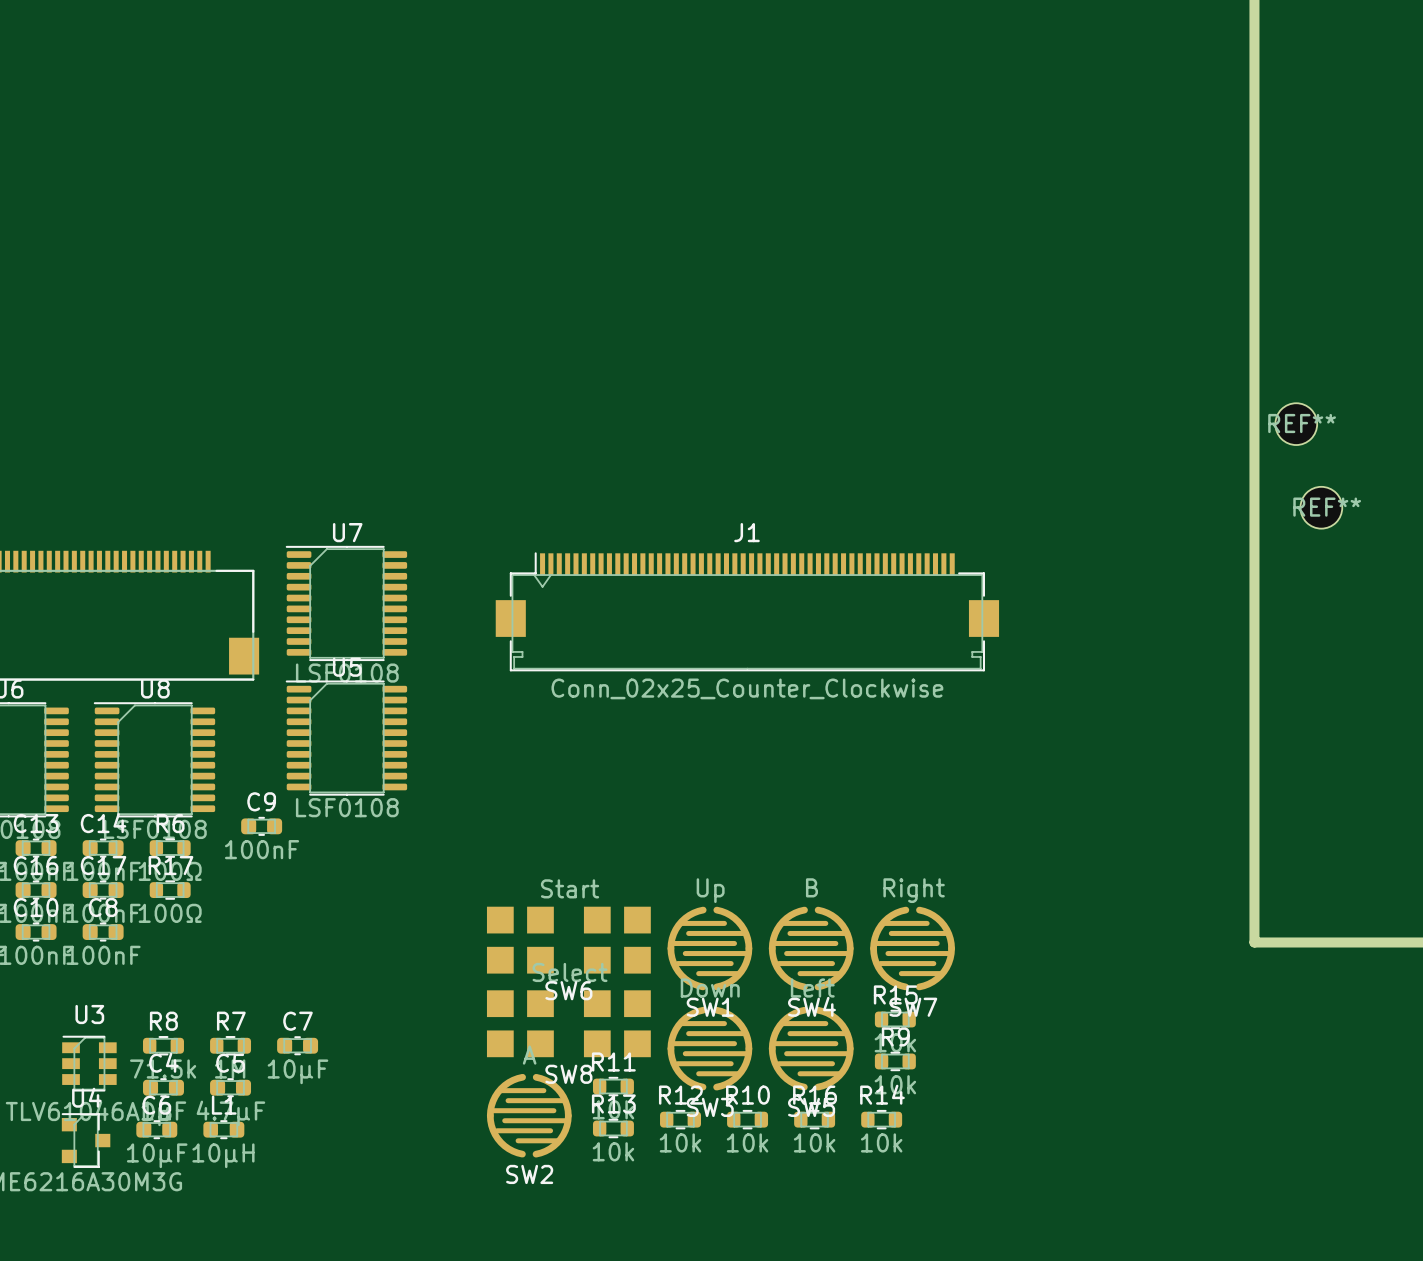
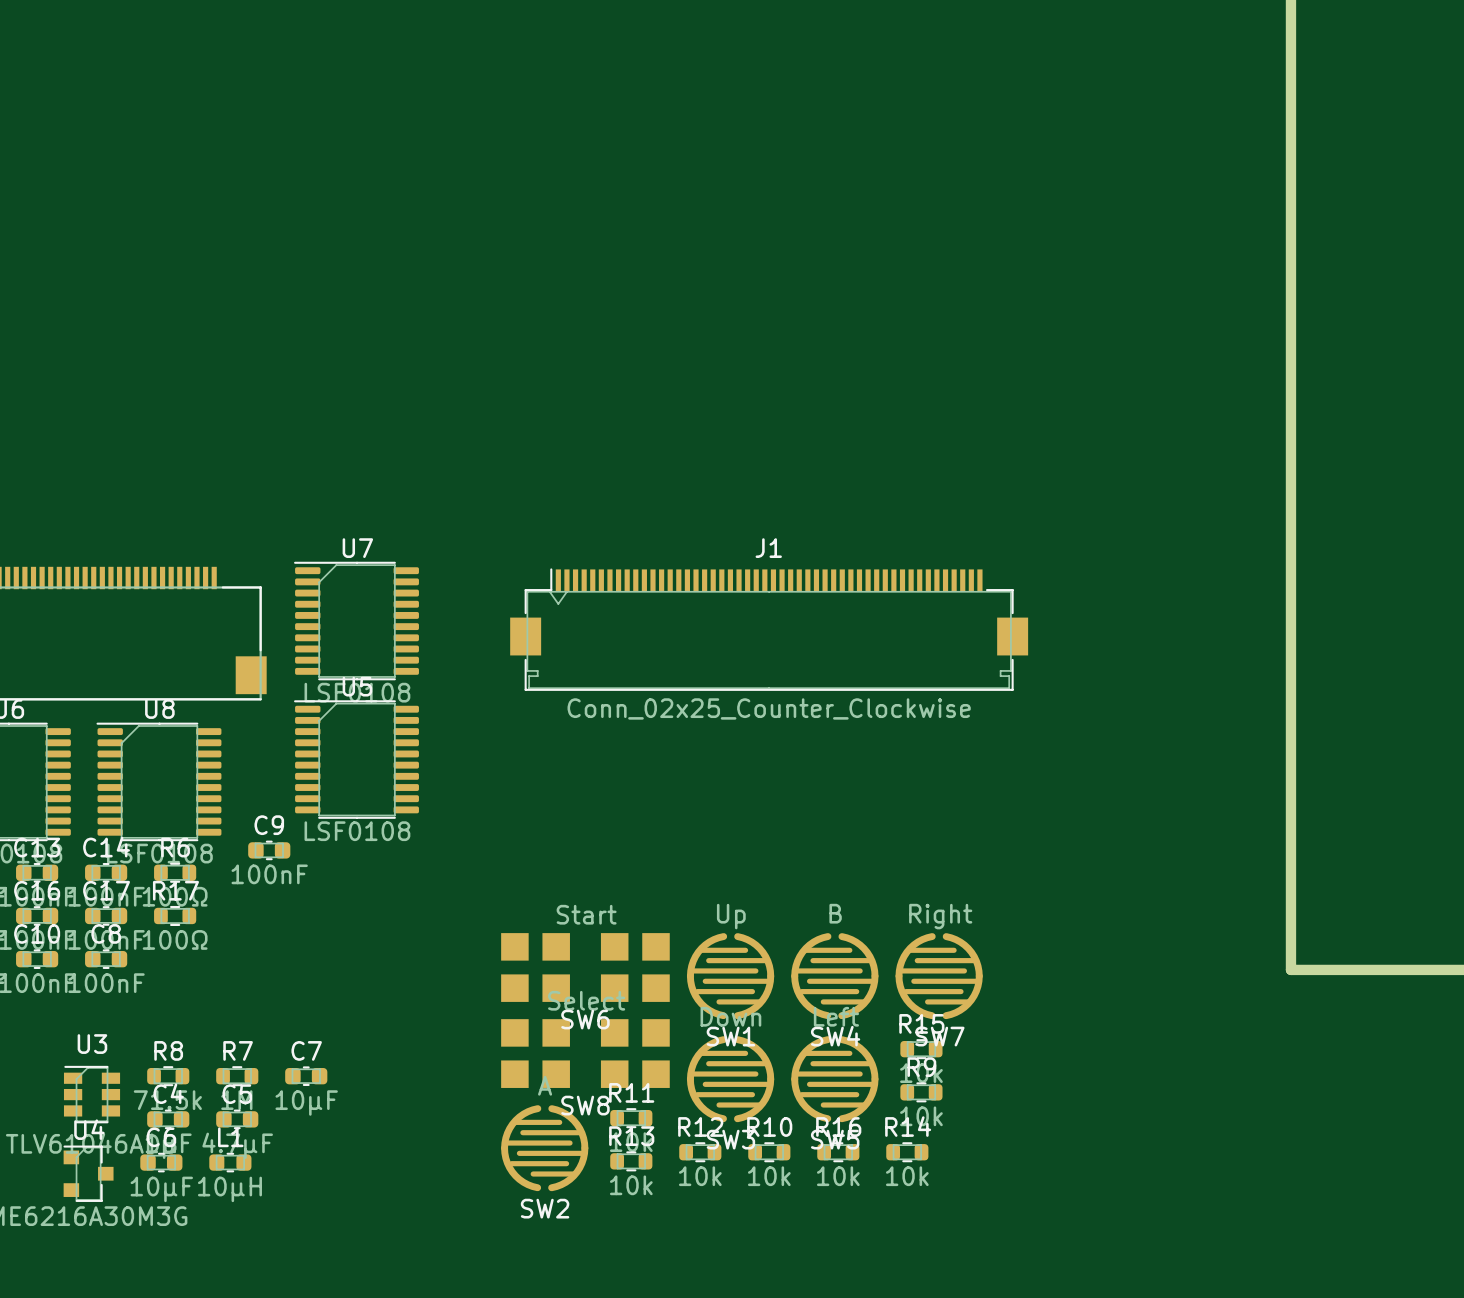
REF**: (1296, 424) -> none
REF**: (1321, 507) -> none

